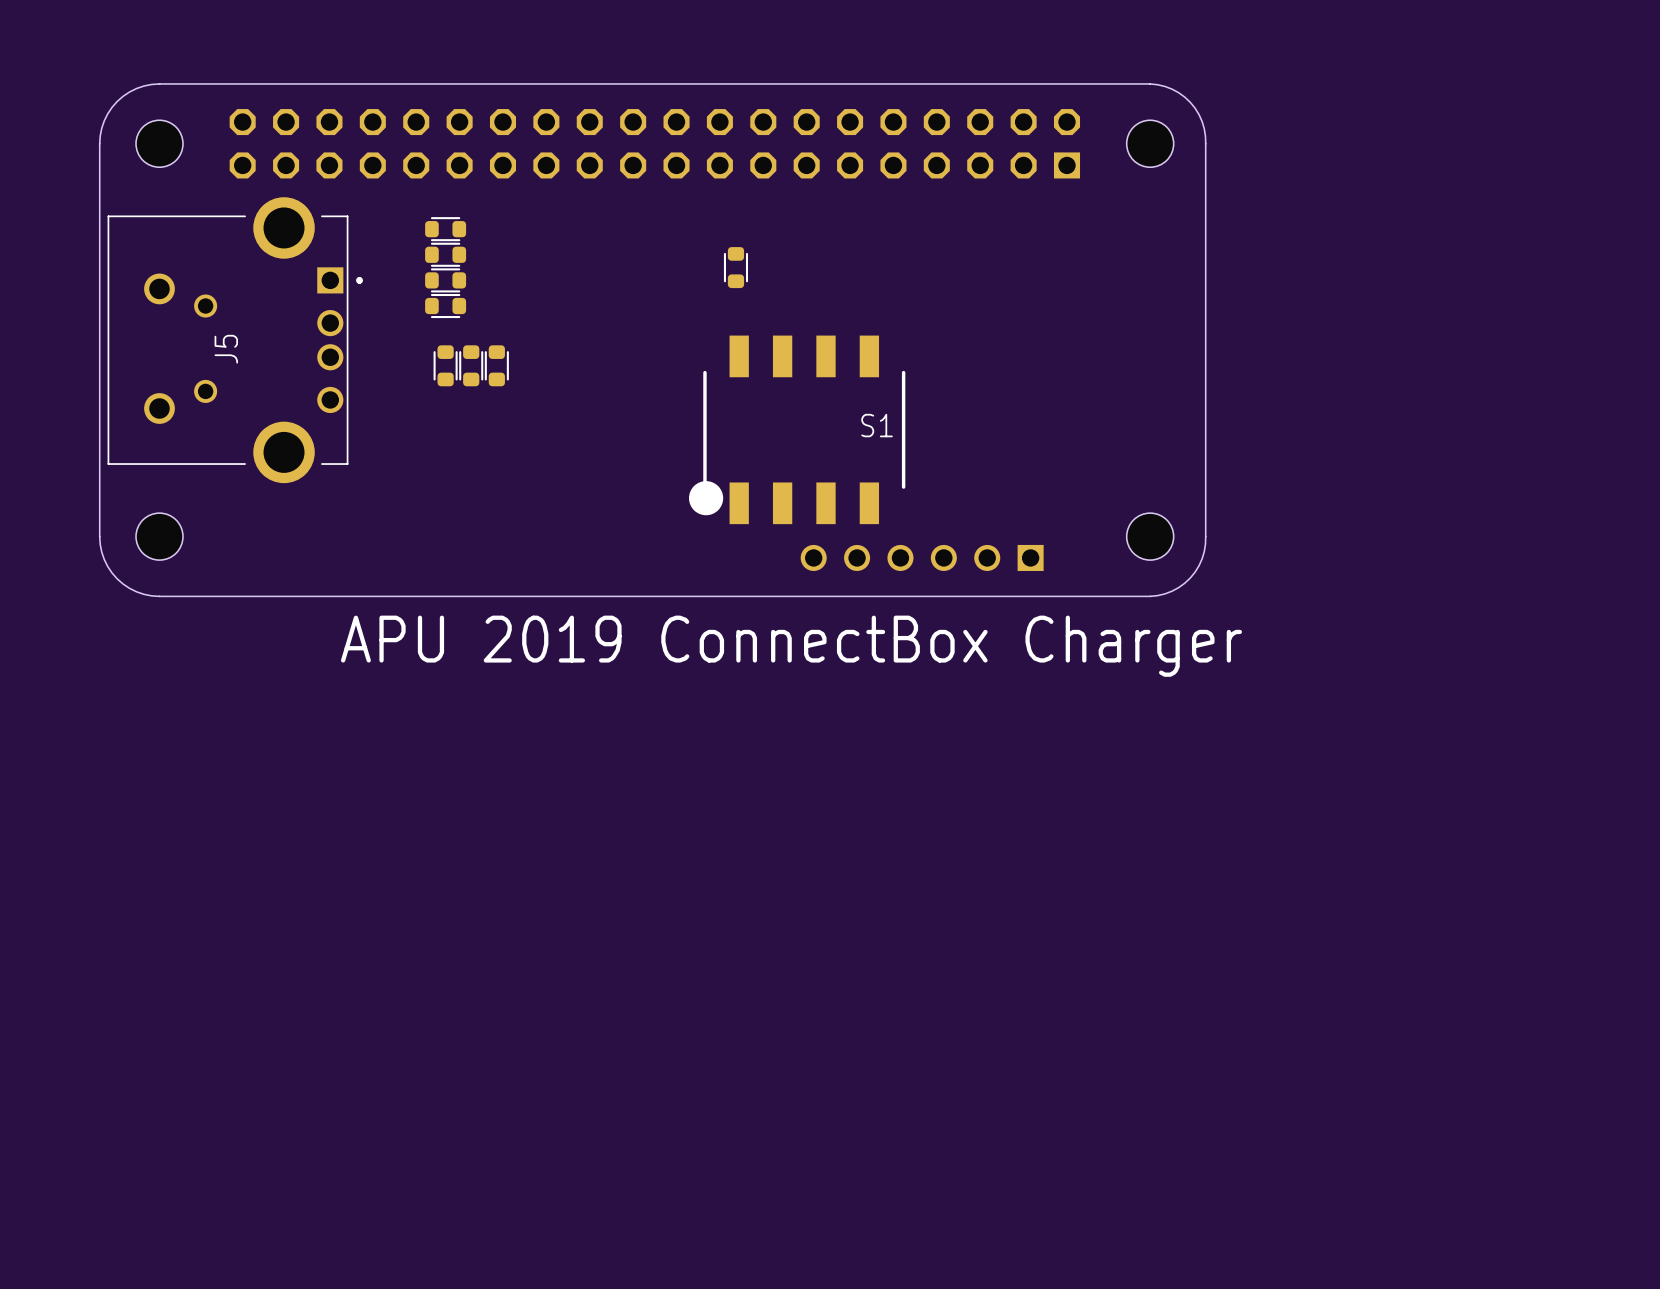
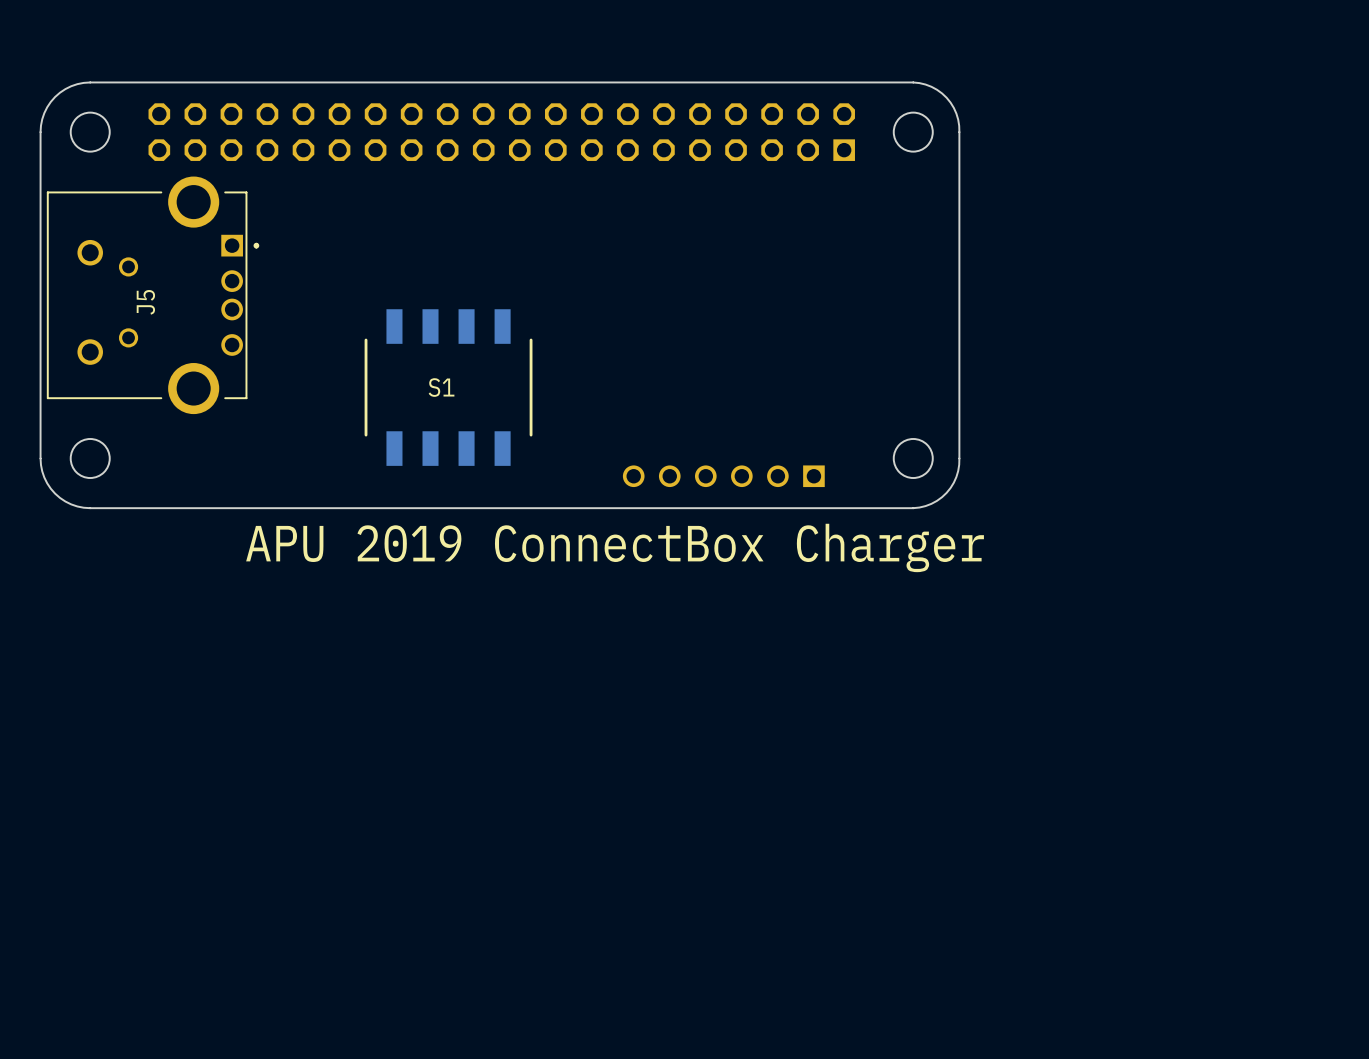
part: (445, 229) -> none
part: (445, 254) -> none
part: (735, 267) -> none
part: (445, 280) -> none
part: (445, 306) -> none
part: (445, 365) -> none
part: (471, 365) -> none
part: (496, 365) -> none
S1 name position: S1 (877, 425) -> S1 (441, 387)
S1 position: (804, 429) -> (448, 387)
drawing: [689, 481, 724, 516] -> none

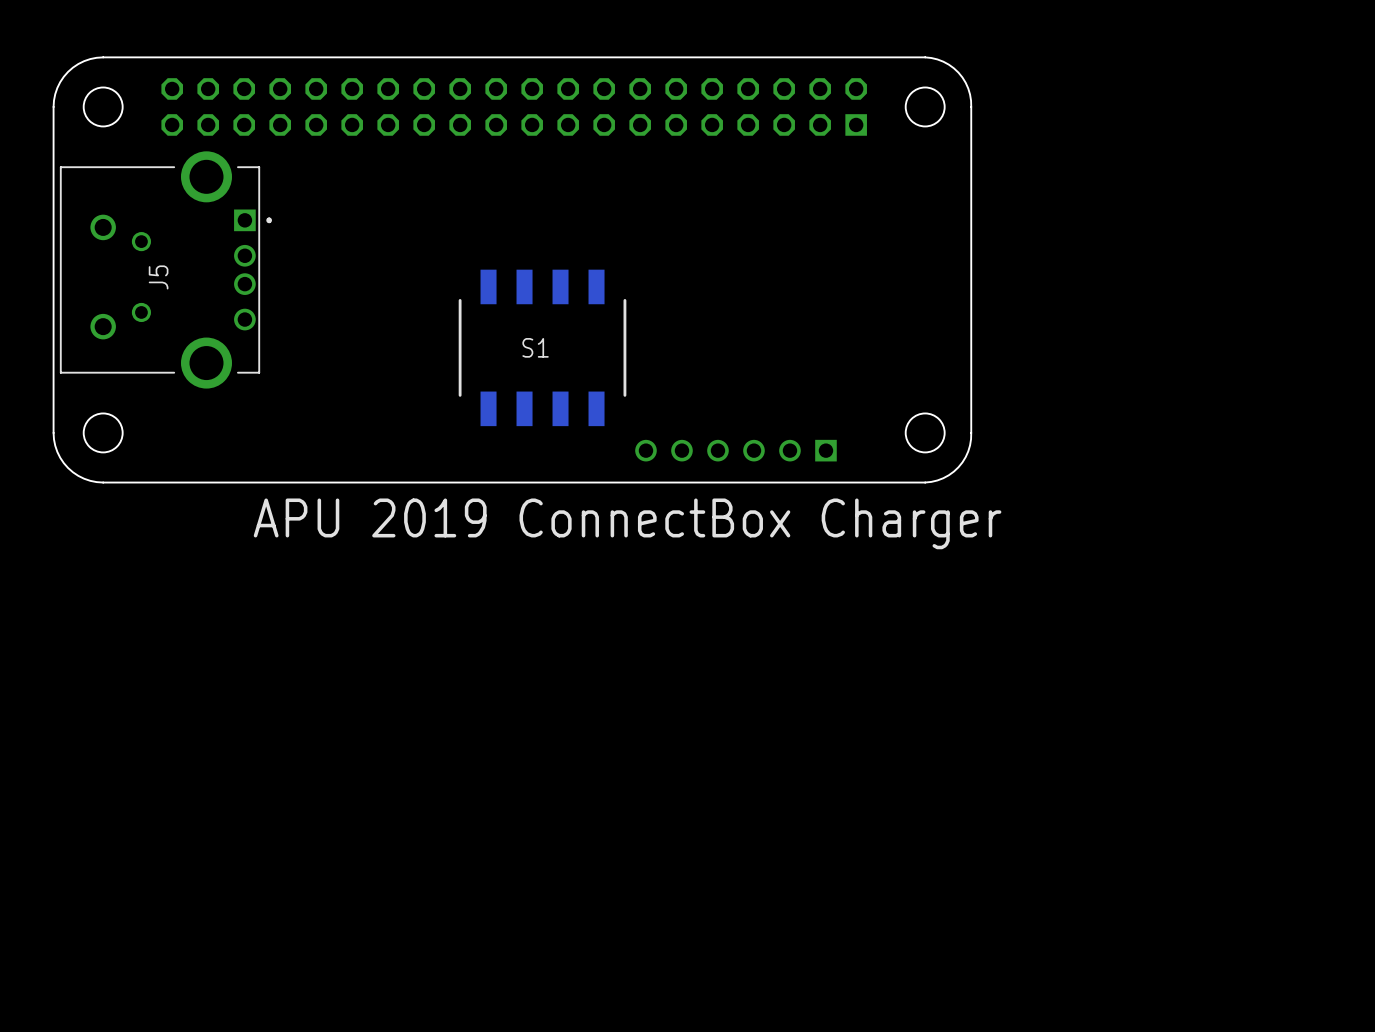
S1 position: (448, 387) -> (542, 347)

